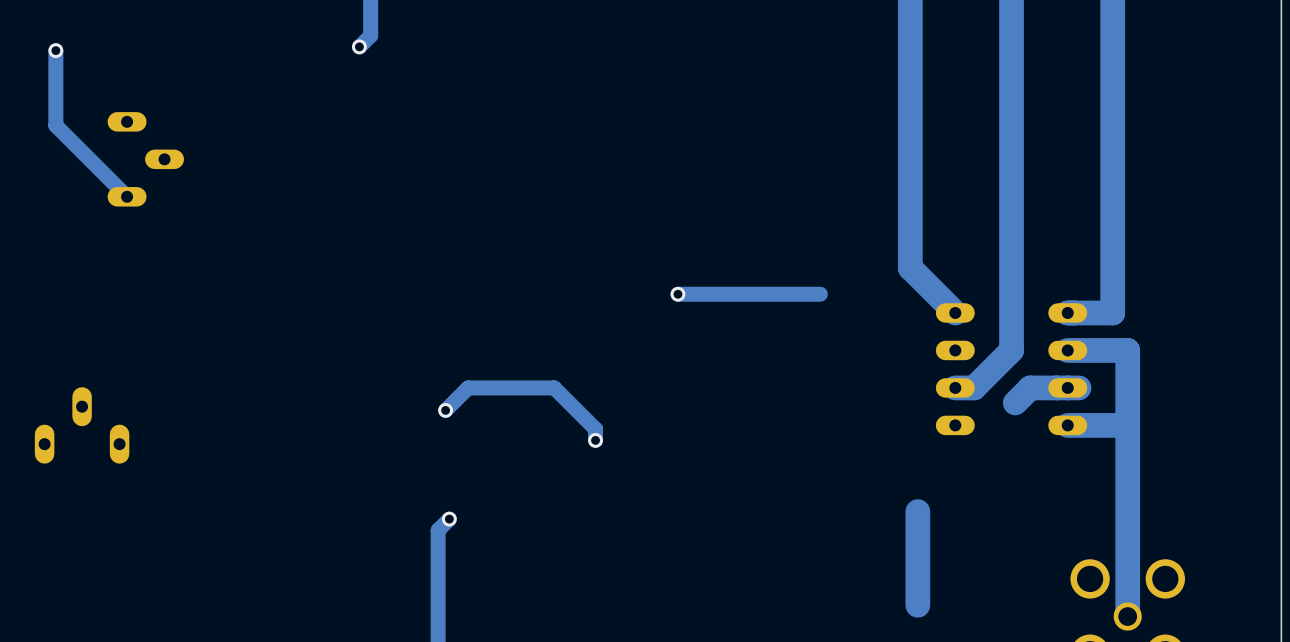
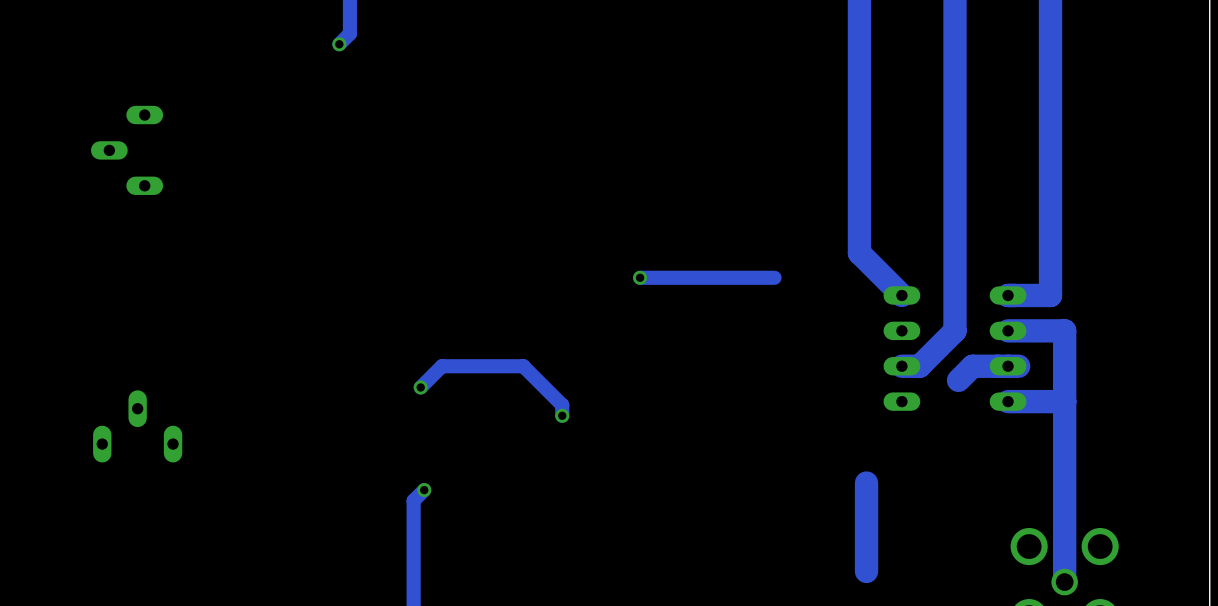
track: (55, 50) (55, 125) (127, 196) -> none
via: (55, 50) -> none
part rotation: 0° (145, 159) -> 180° (127, 150)
part position: (82, 425) -> (137, 426)

